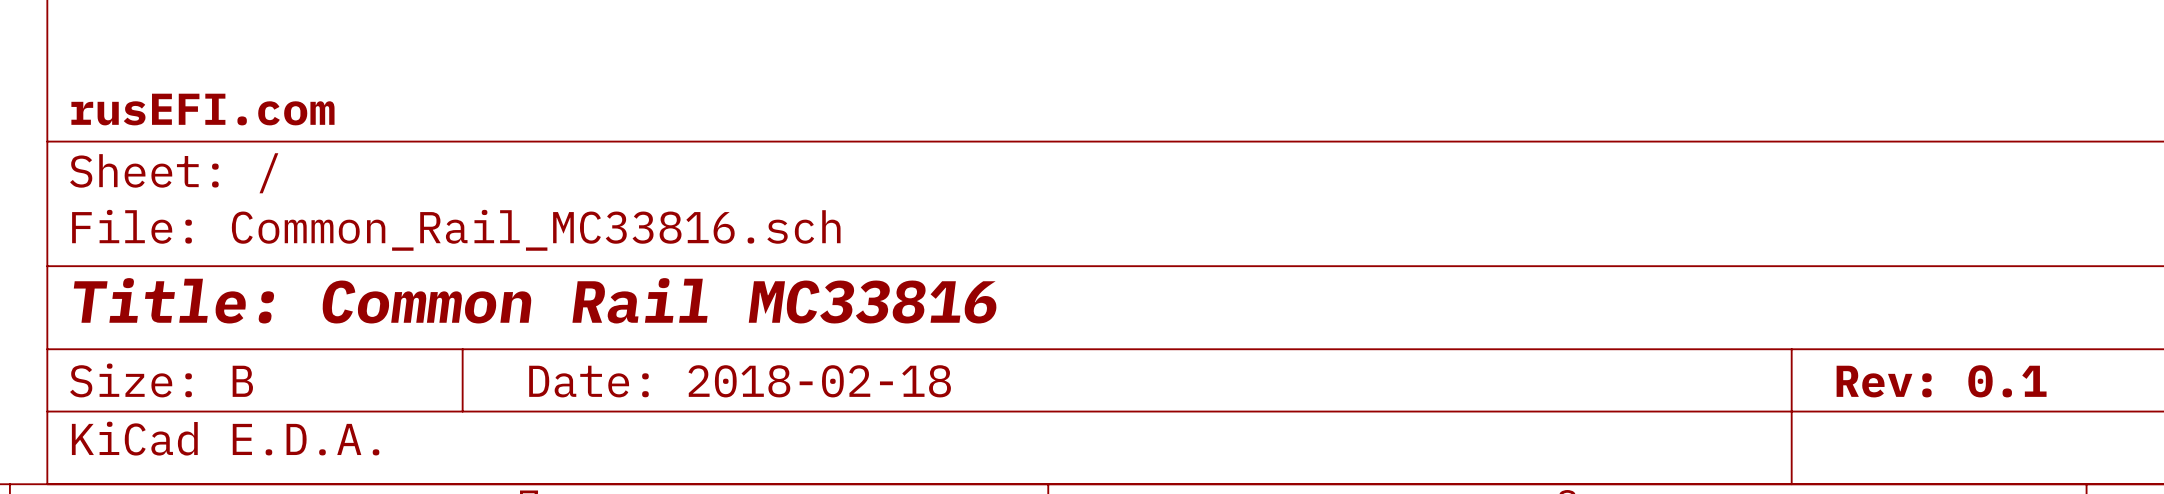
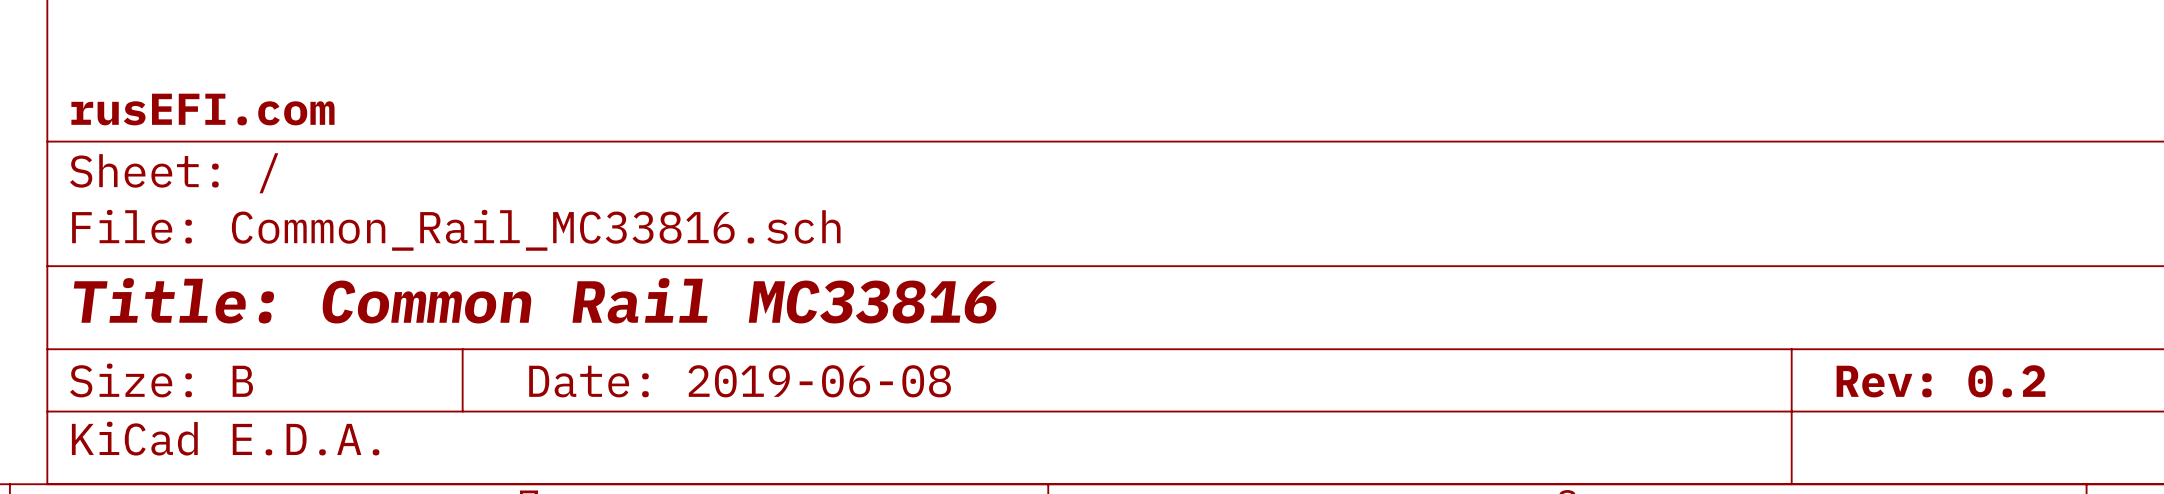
title block: Date: 2018-02-18 (740, 381) -> Date: 2019-06-08 (740, 381)
title block: Rev: 0.1 (1941, 381) -> Rev: 0.2 (1941, 381)

